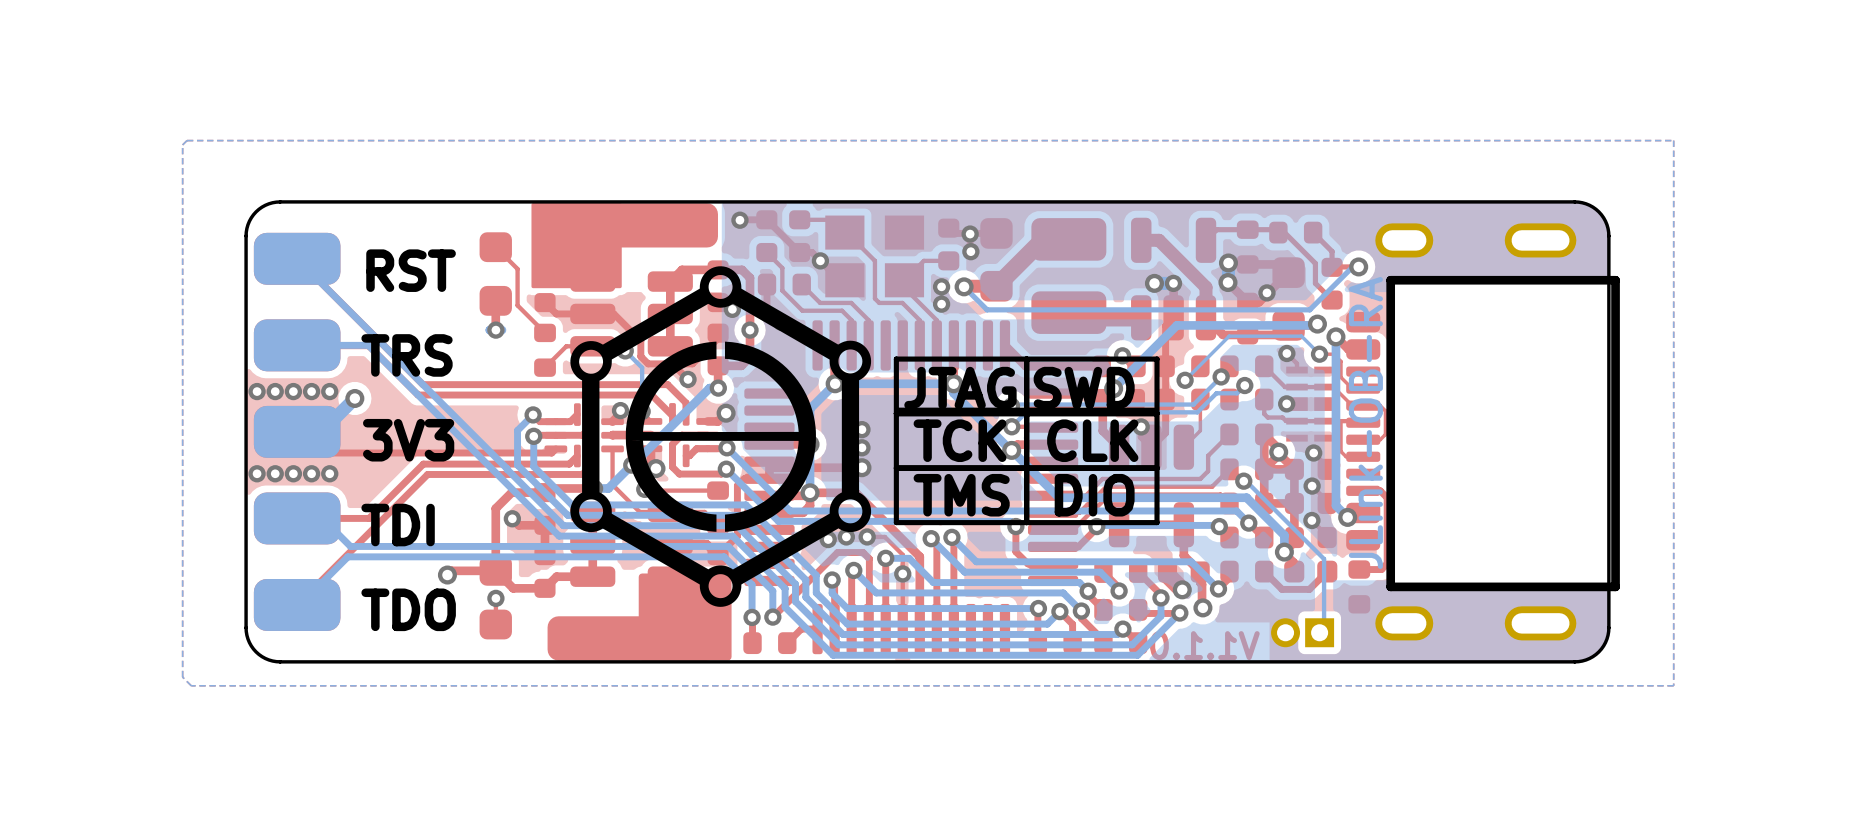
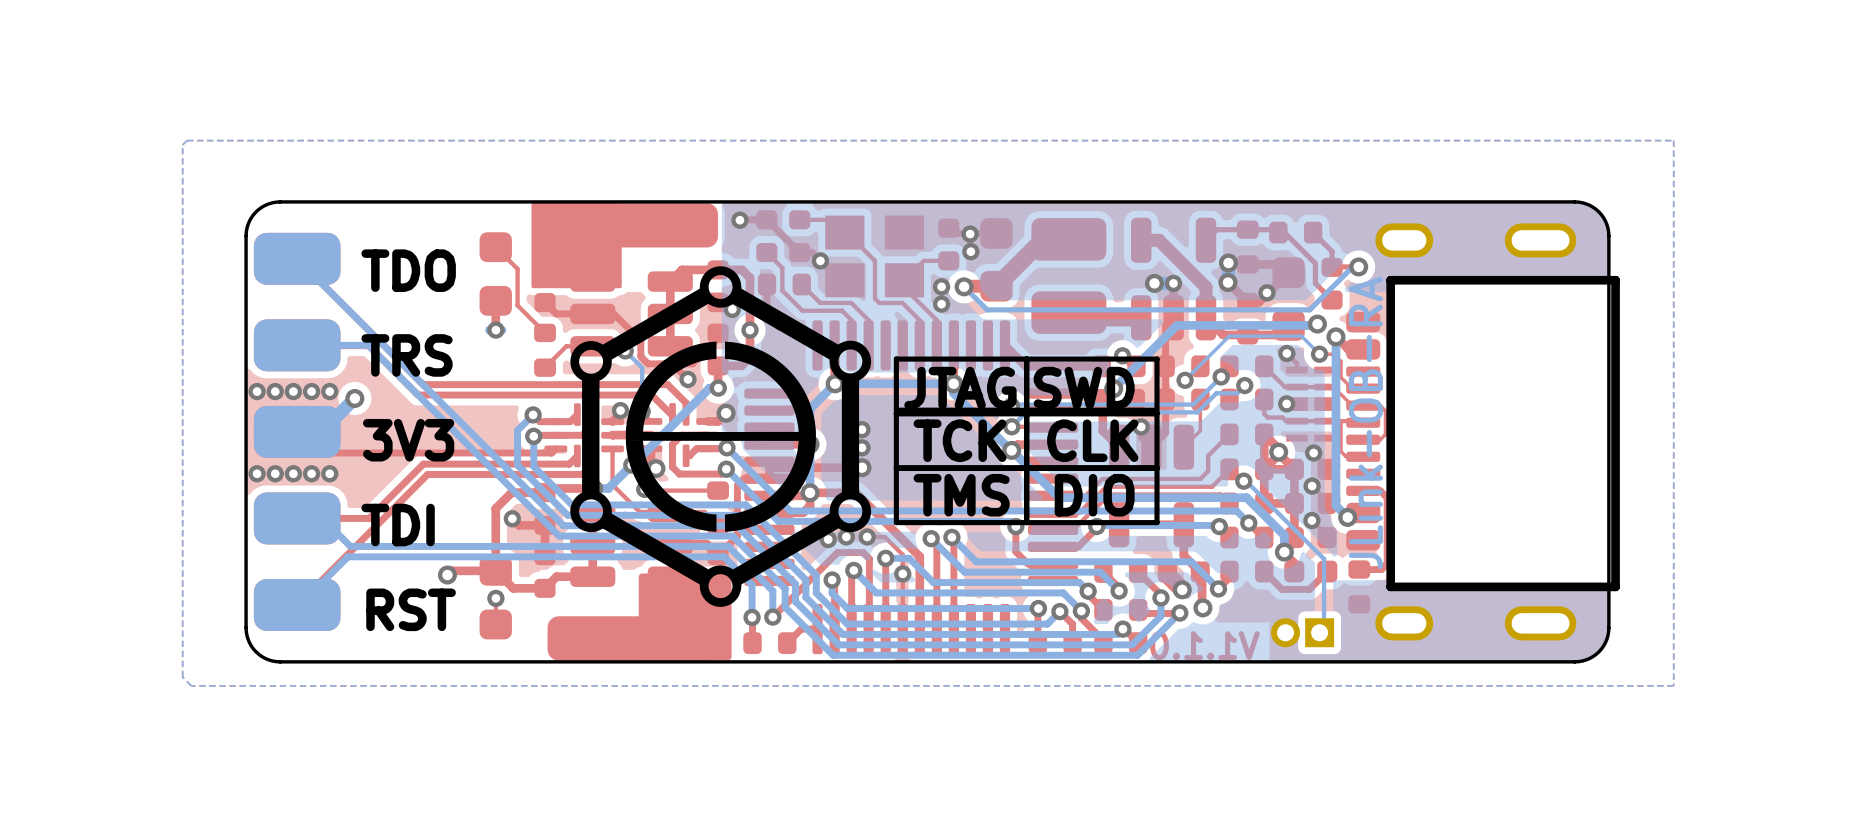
text: RST (411, 270) -> TDO (408, 270)
text: TDO (408, 609) -> RST (411, 609)

